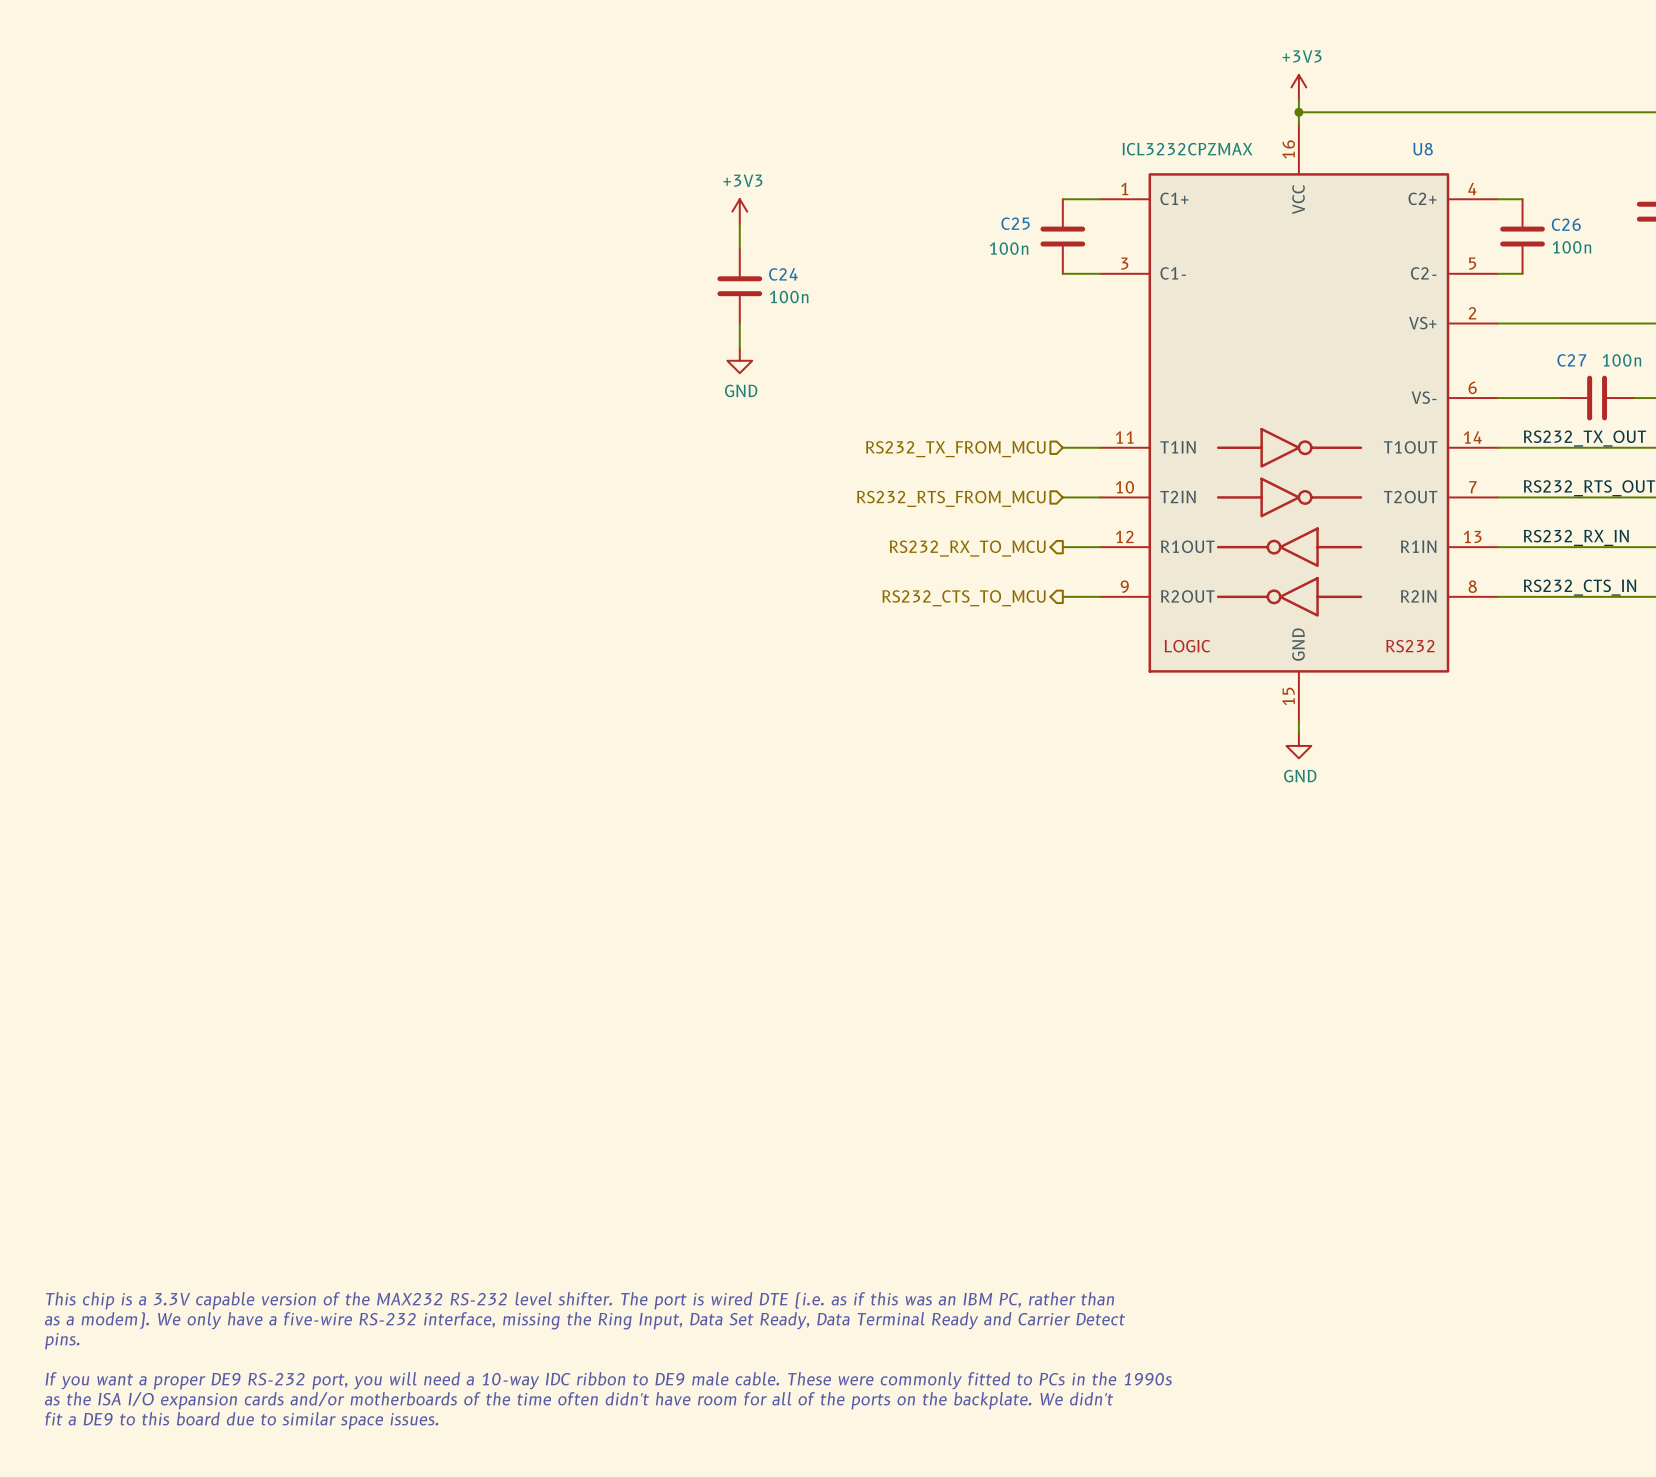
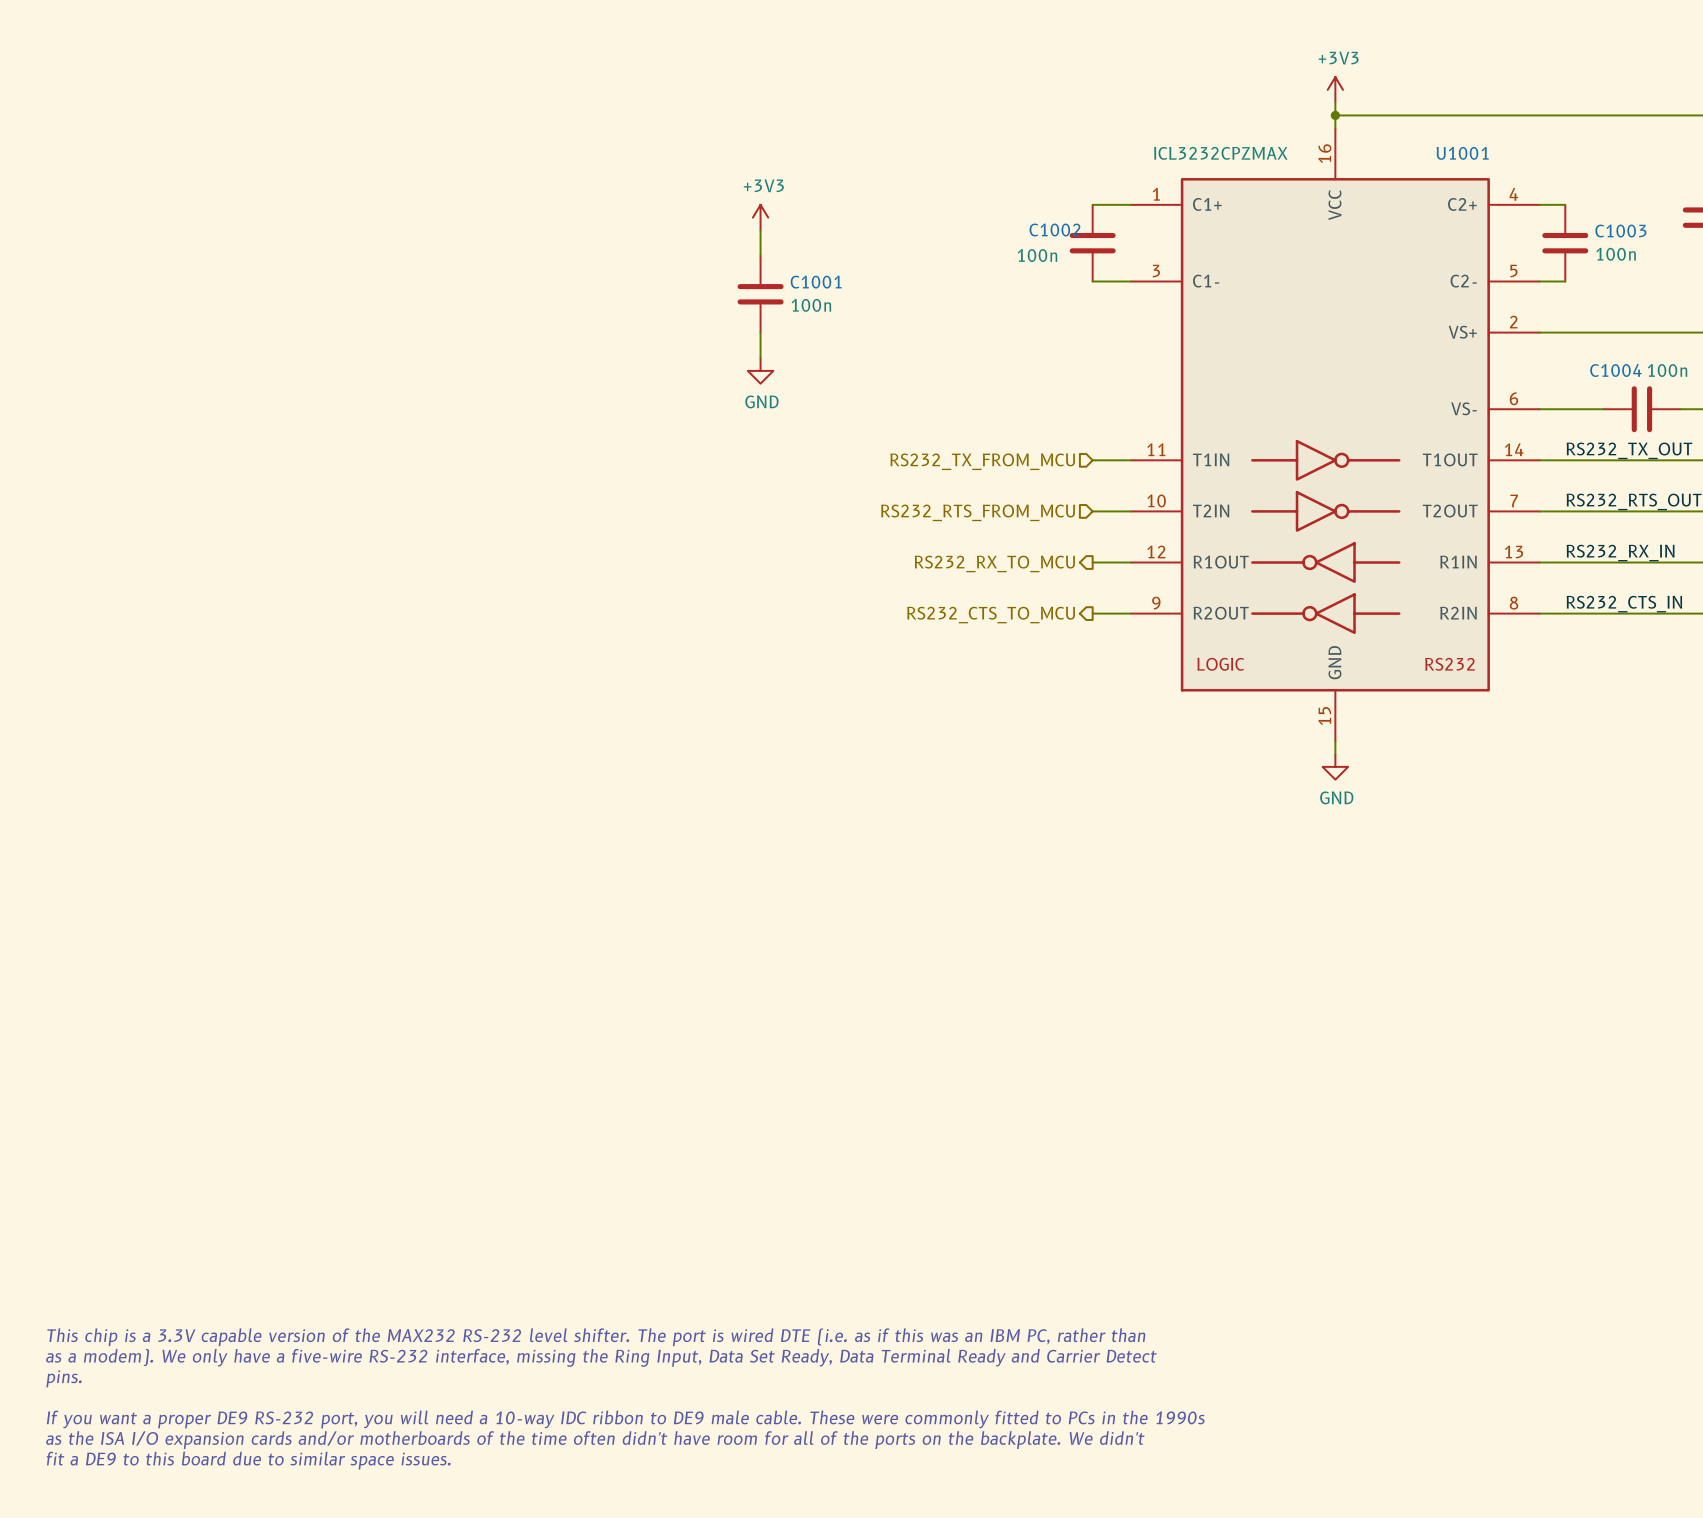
U8 name: U8 (1423, 149) -> U1001 (1462, 153)
C25 name: C25 (1015, 223) -> C1002 (1055, 229)
C26 name: C26 (1566, 224) -> C1003 (1620, 231)
C24 name: C24 (783, 274) -> C1001 (816, 282)
C27 name: C27 (1571, 360) -> C1004 (1615, 370)

